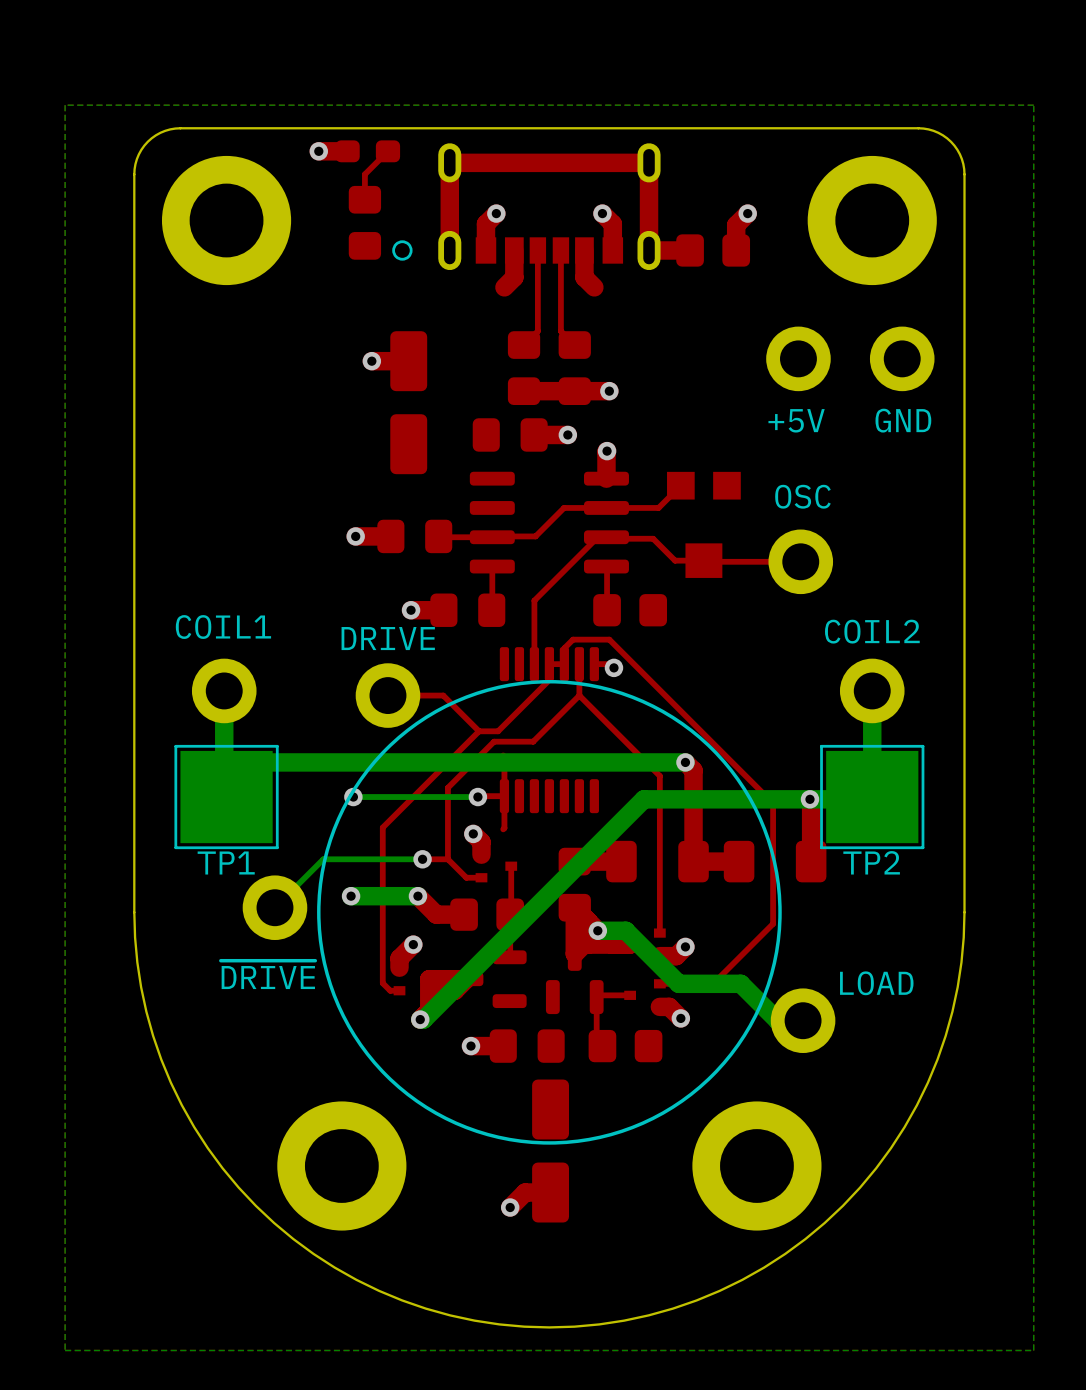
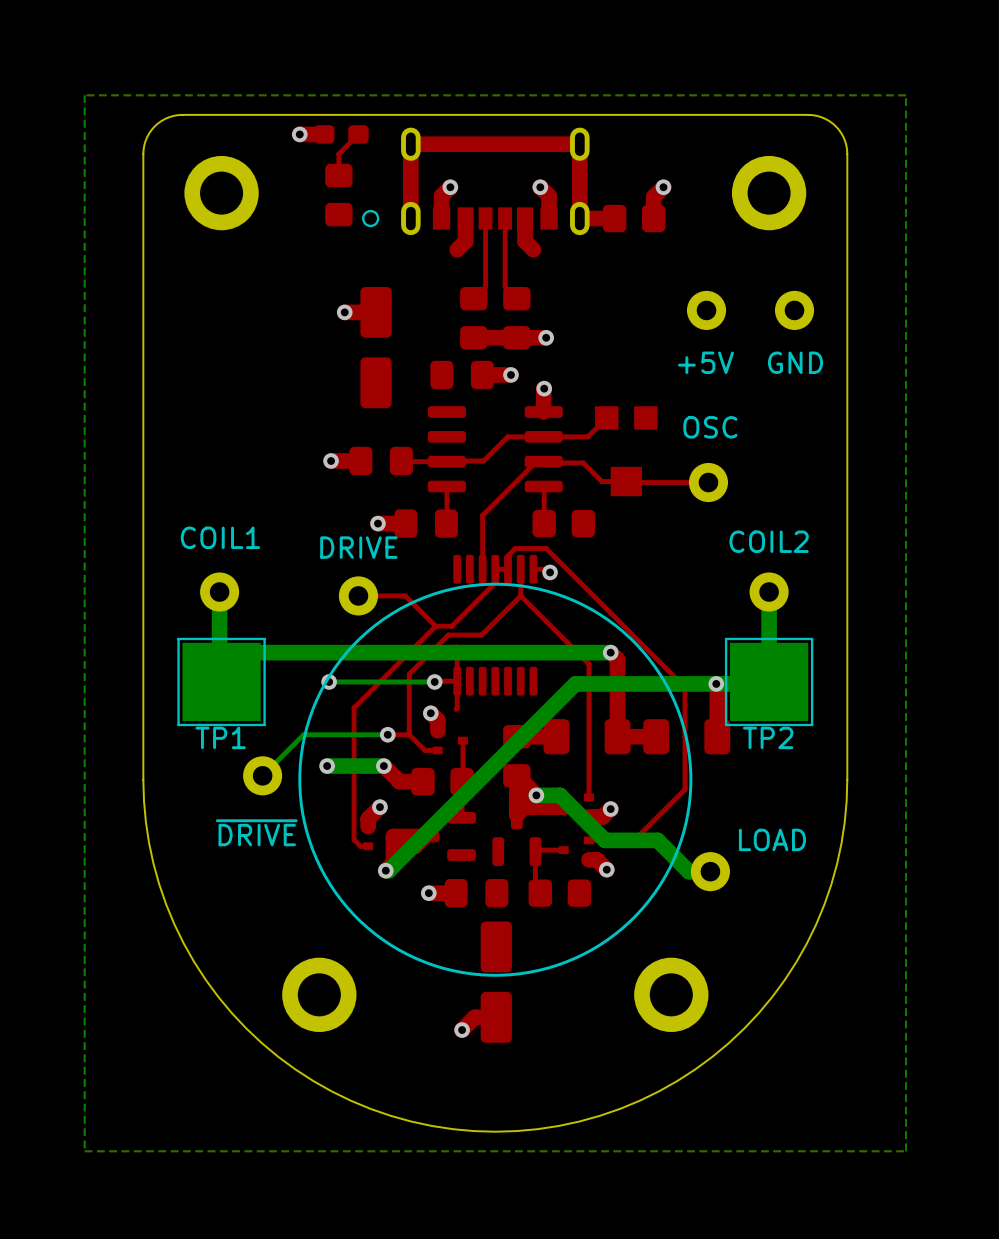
part footprint: [161, 155, 292, 286] -> [184, 155, 259, 231]
part footprint: [807, 155, 937, 286] -> [731, 155, 807, 231]
part footprint: [766, 326, 831, 392] -> [686, 290, 727, 330]
part footprint: [869, 326, 935, 392] -> [774, 290, 815, 330]
part footprint: [768, 529, 834, 595] -> [688, 462, 729, 503]
part footprint: [191, 658, 257, 724] -> [200, 572, 240, 612]
part footprint: [839, 658, 905, 724] -> [749, 572, 789, 612]
part footprint: [355, 663, 421, 728] -> [338, 576, 379, 616]
part footprint: [242, 875, 308, 941] -> [243, 756, 283, 796]
part footprint: [770, 988, 836, 1054] -> [690, 852, 730, 892]
part footprint: [277, 1101, 407, 1231] -> [282, 957, 357, 1032]
part footprint: [692, 1101, 822, 1231] -> [634, 957, 709, 1032]

